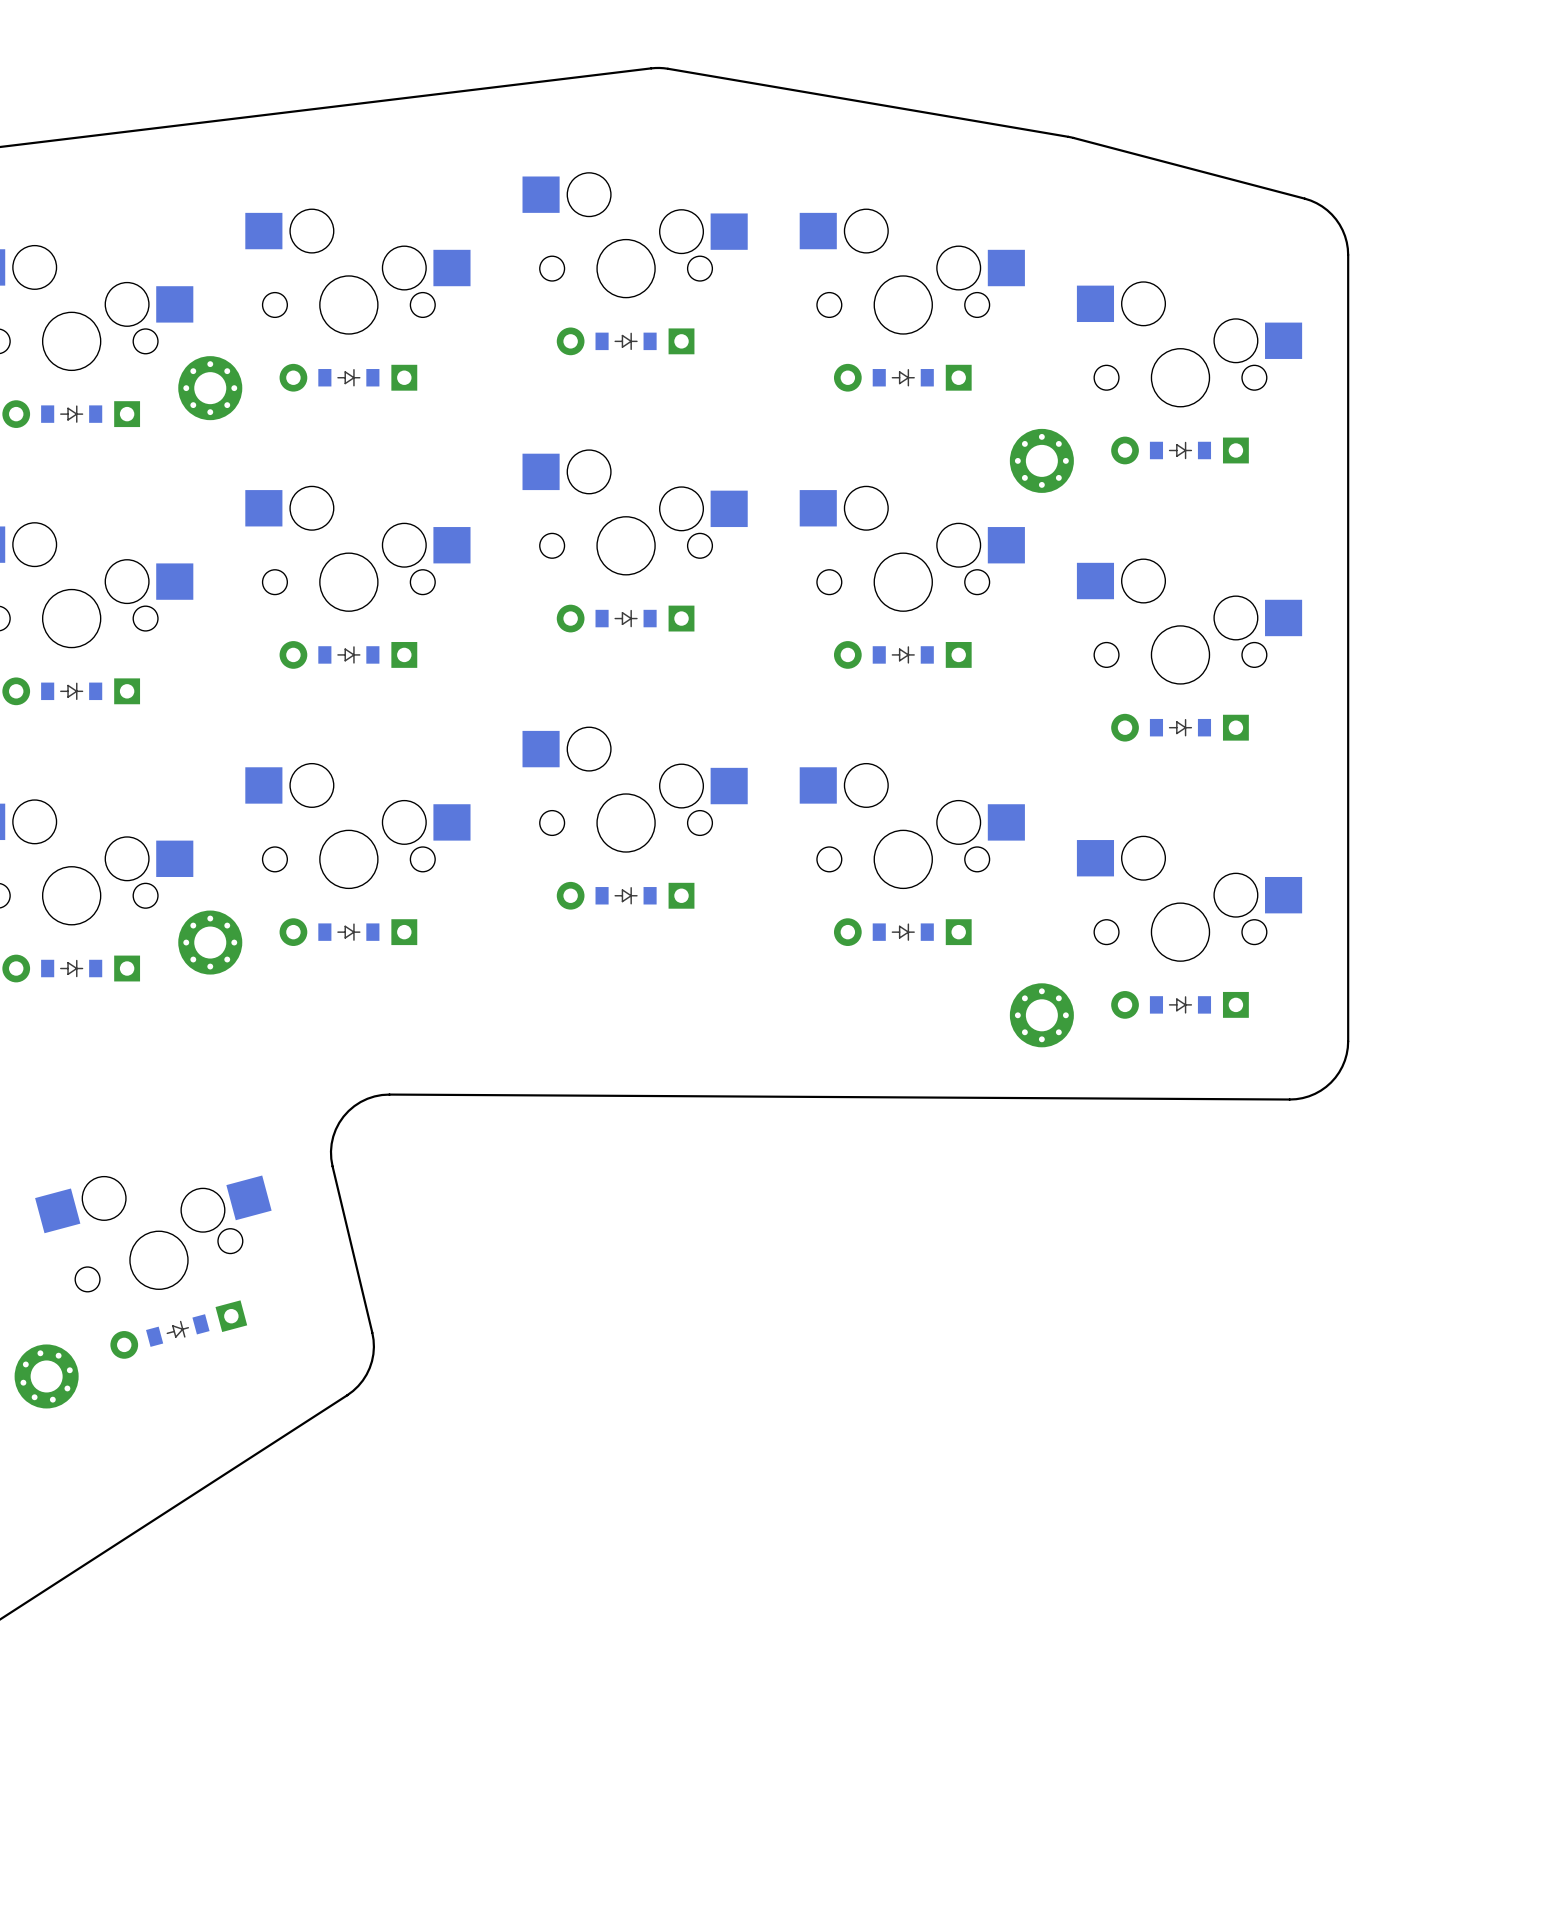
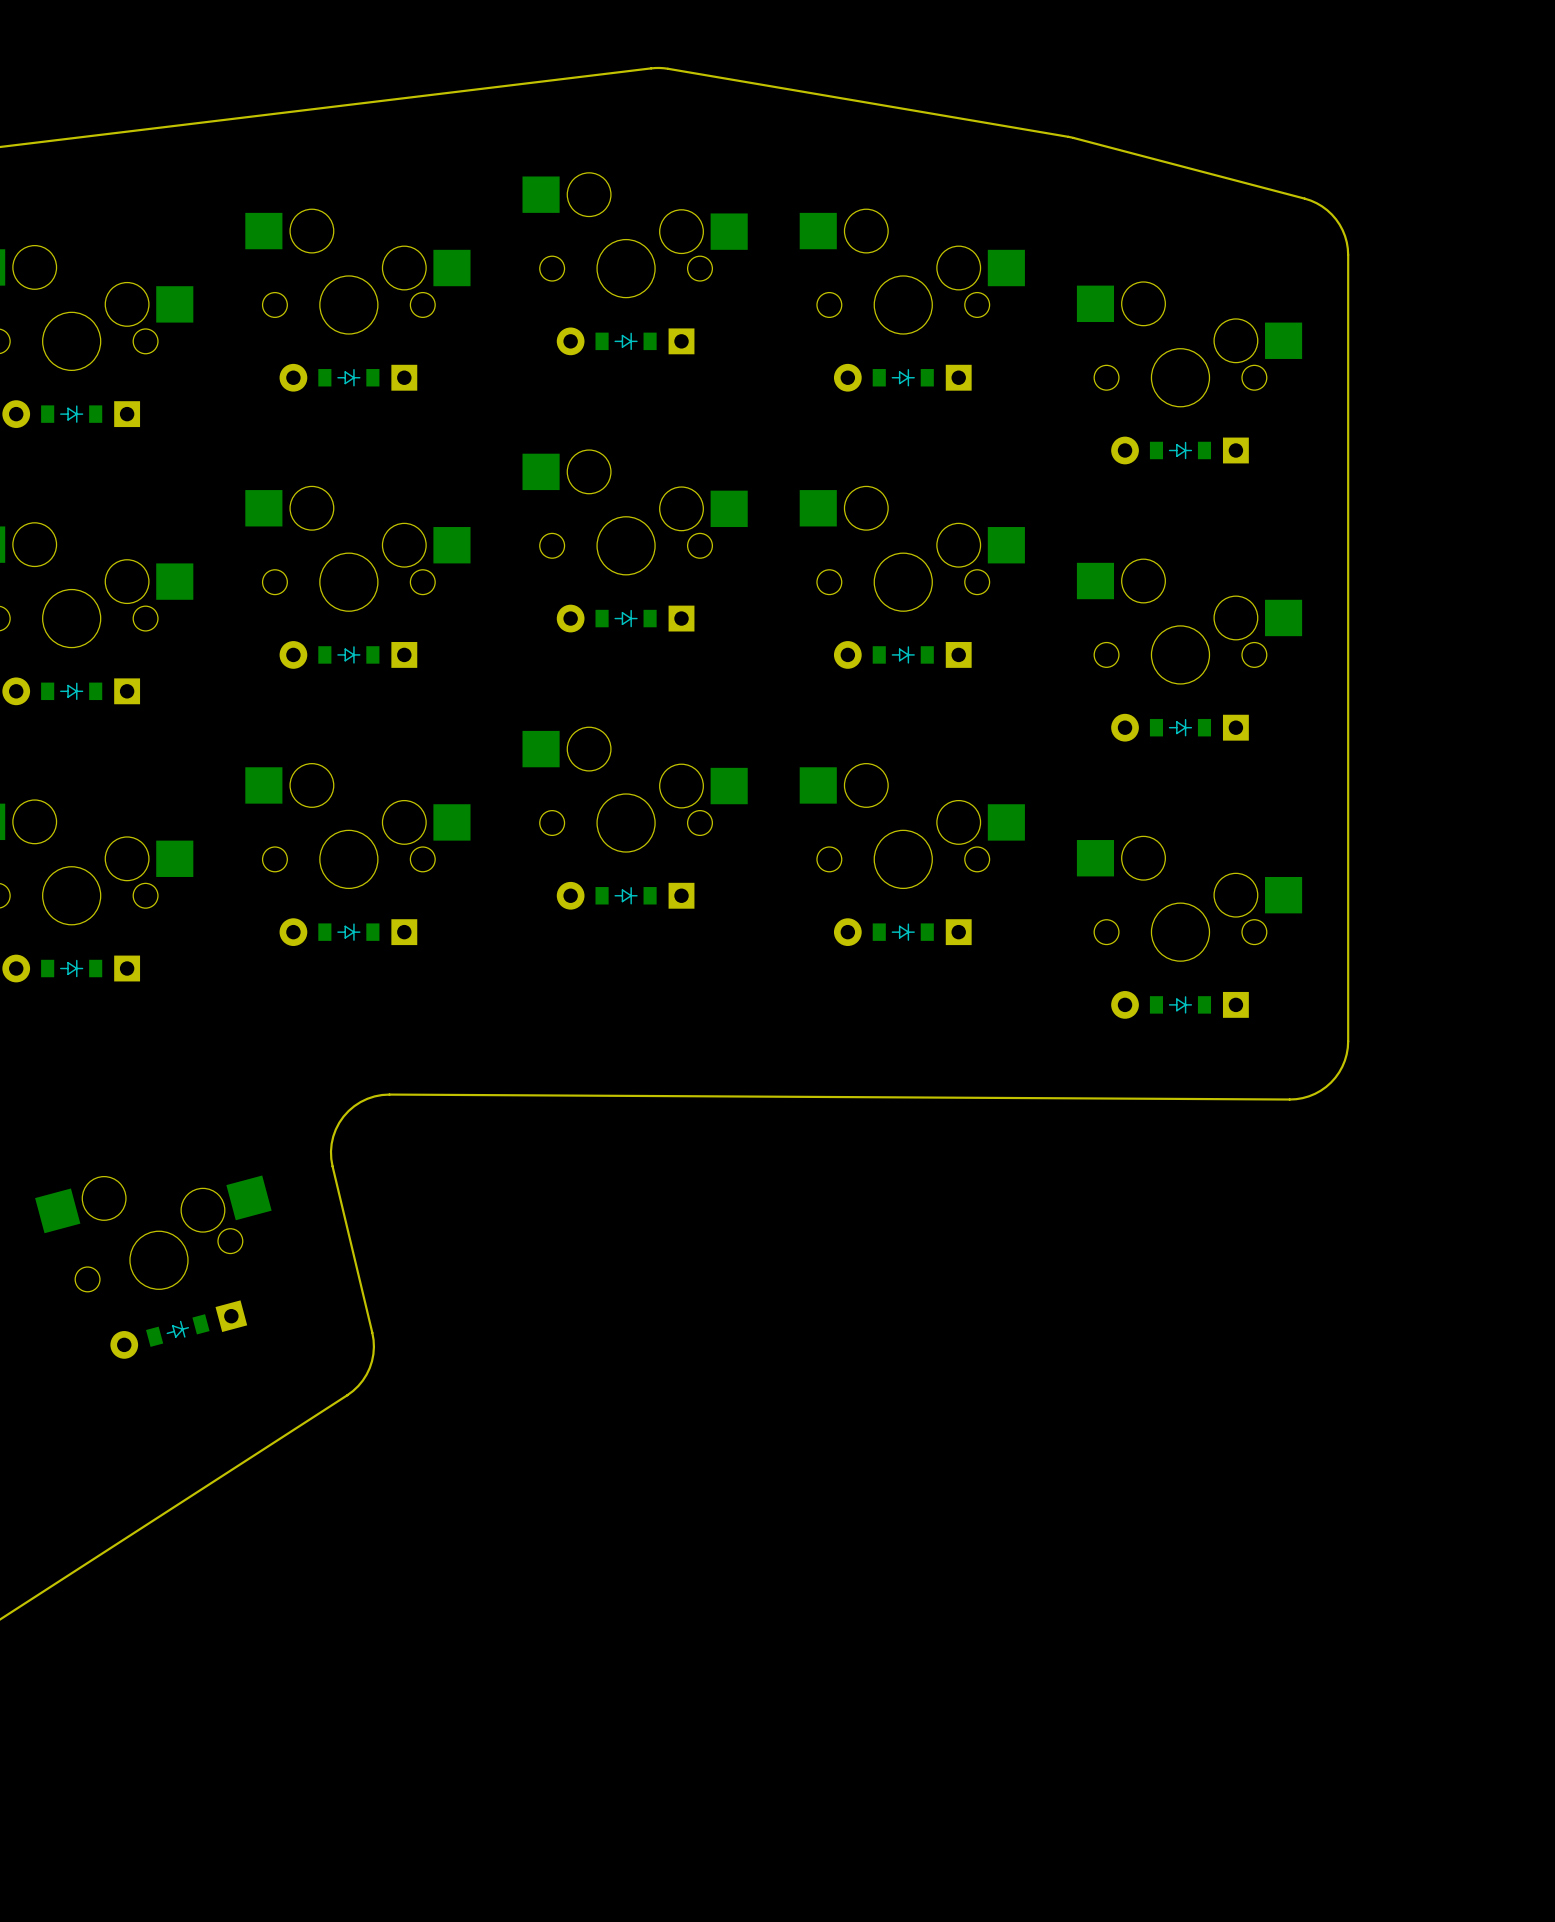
part: (210, 388) -> none
part: (1041, 460) -> none
part: (210, 942) -> none
part: (1041, 1015) -> none
part: (46, 1376) -> none

